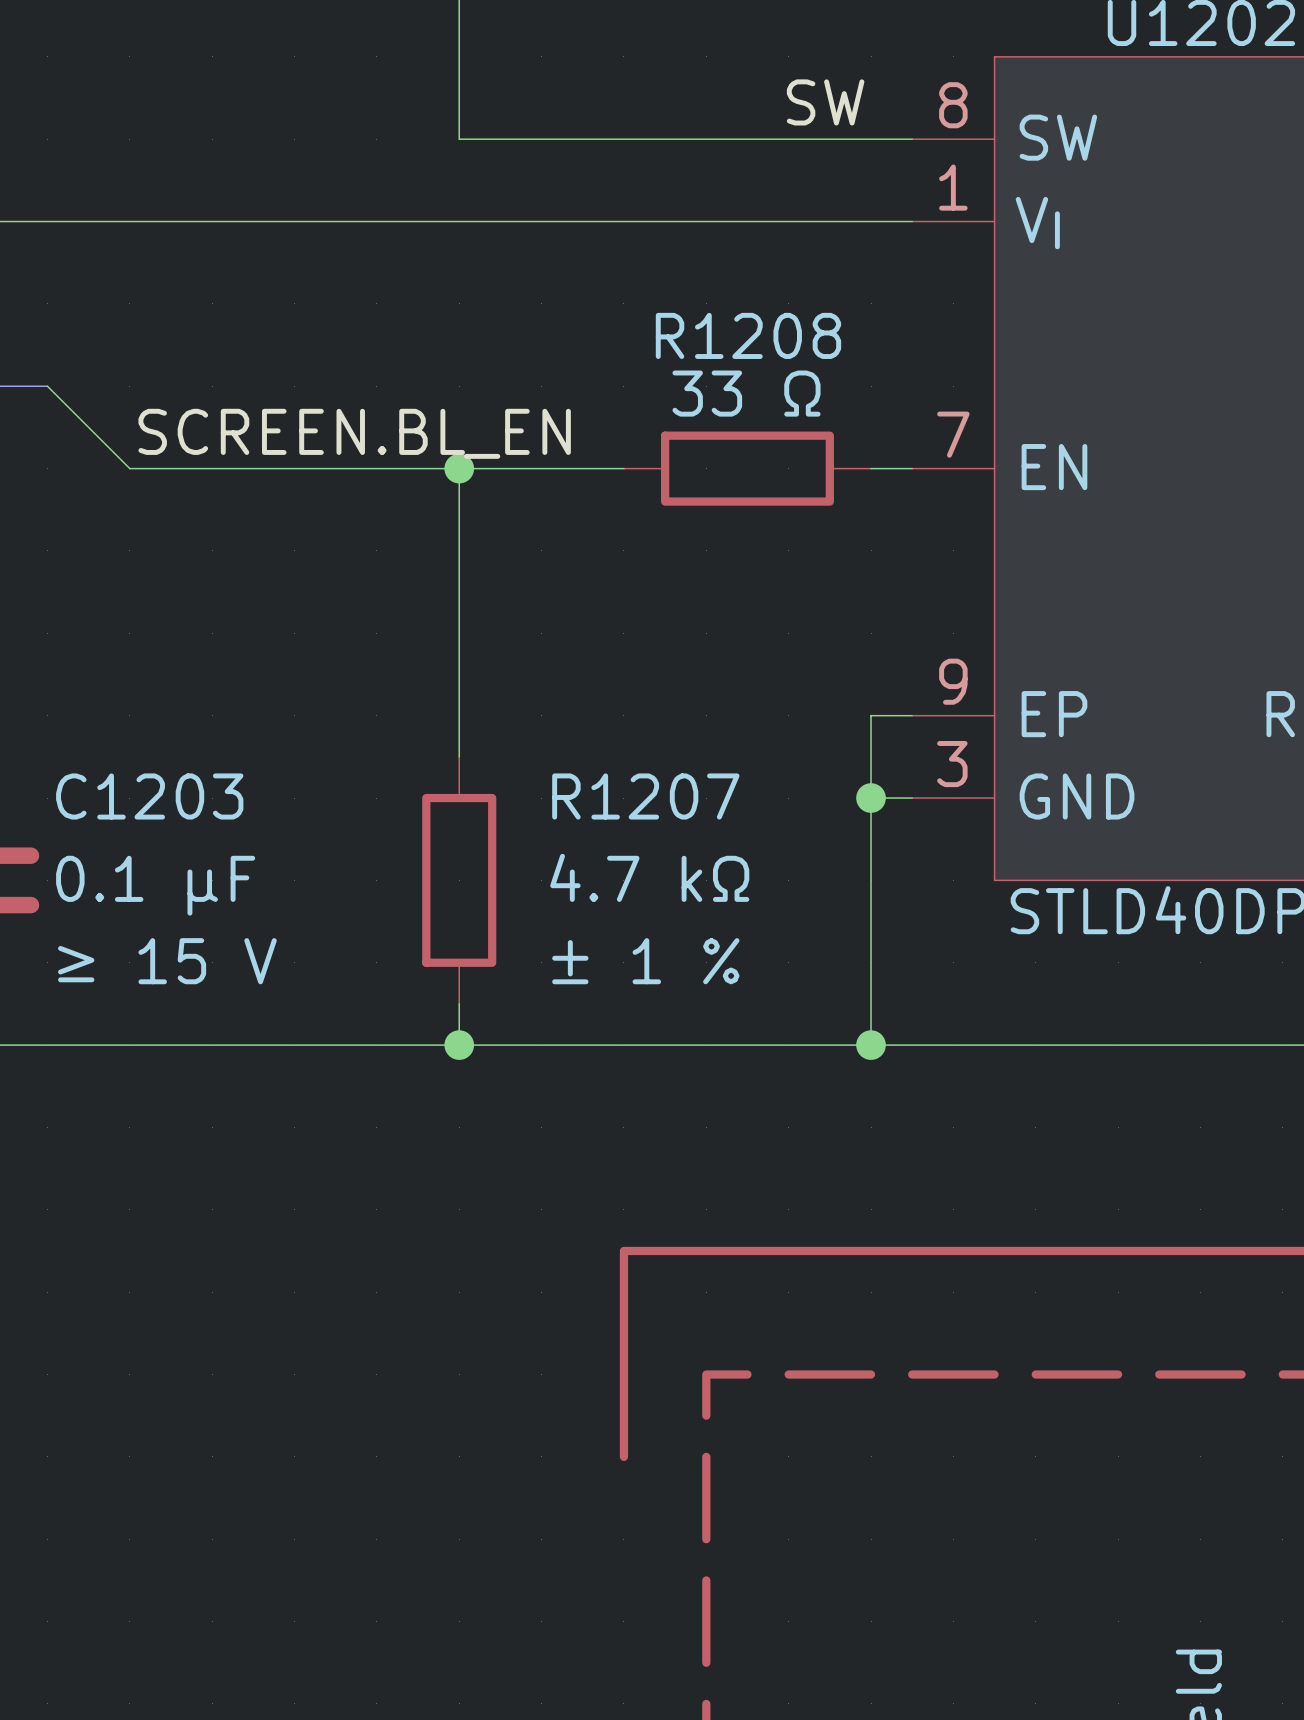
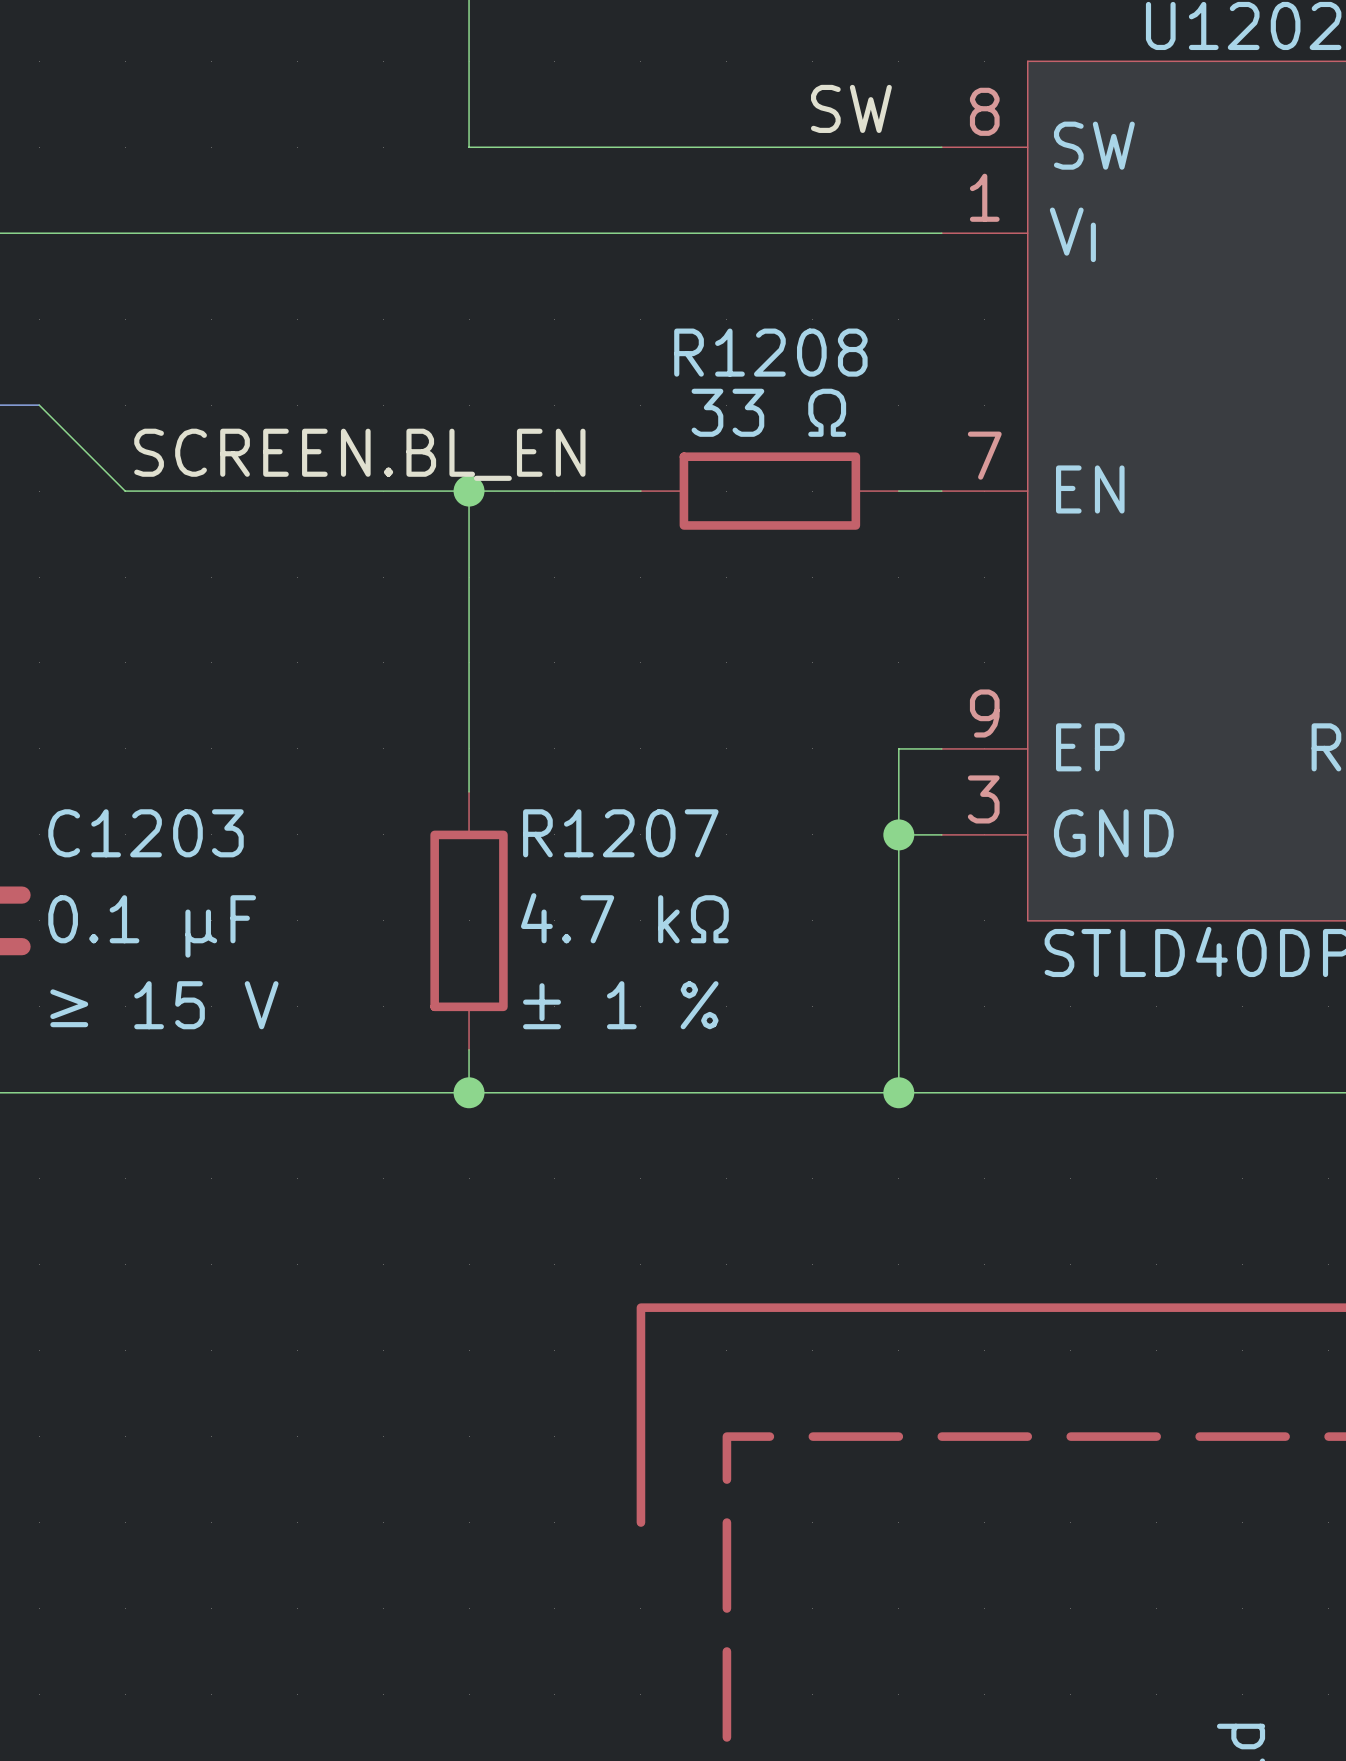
R1207 name position: R1207 (645, 796) -> R1207 (620, 833)
R1207 value position: 4.7 kΩ (649, 877) -> 4.7 kΩ (624, 918)
R1207 text position: ± 1 % (645, 961) -> ± 1 % (620, 1005)

